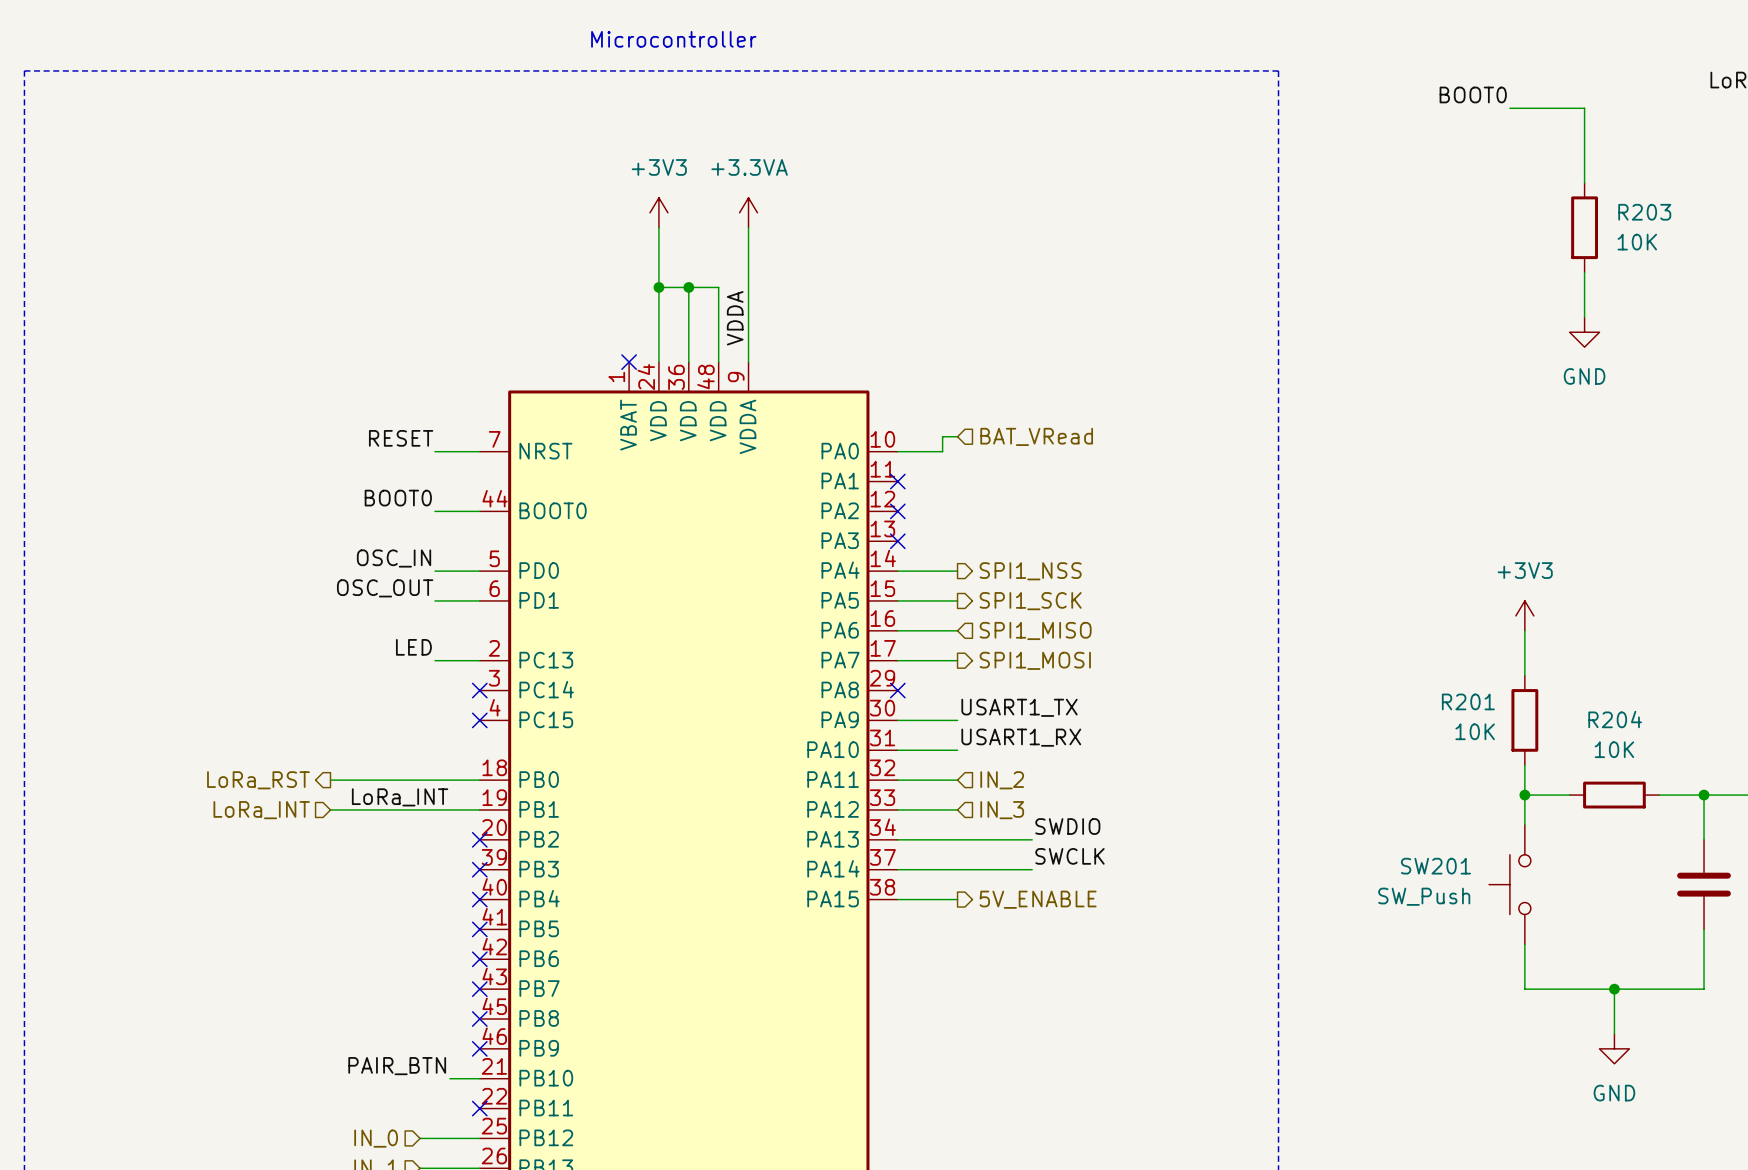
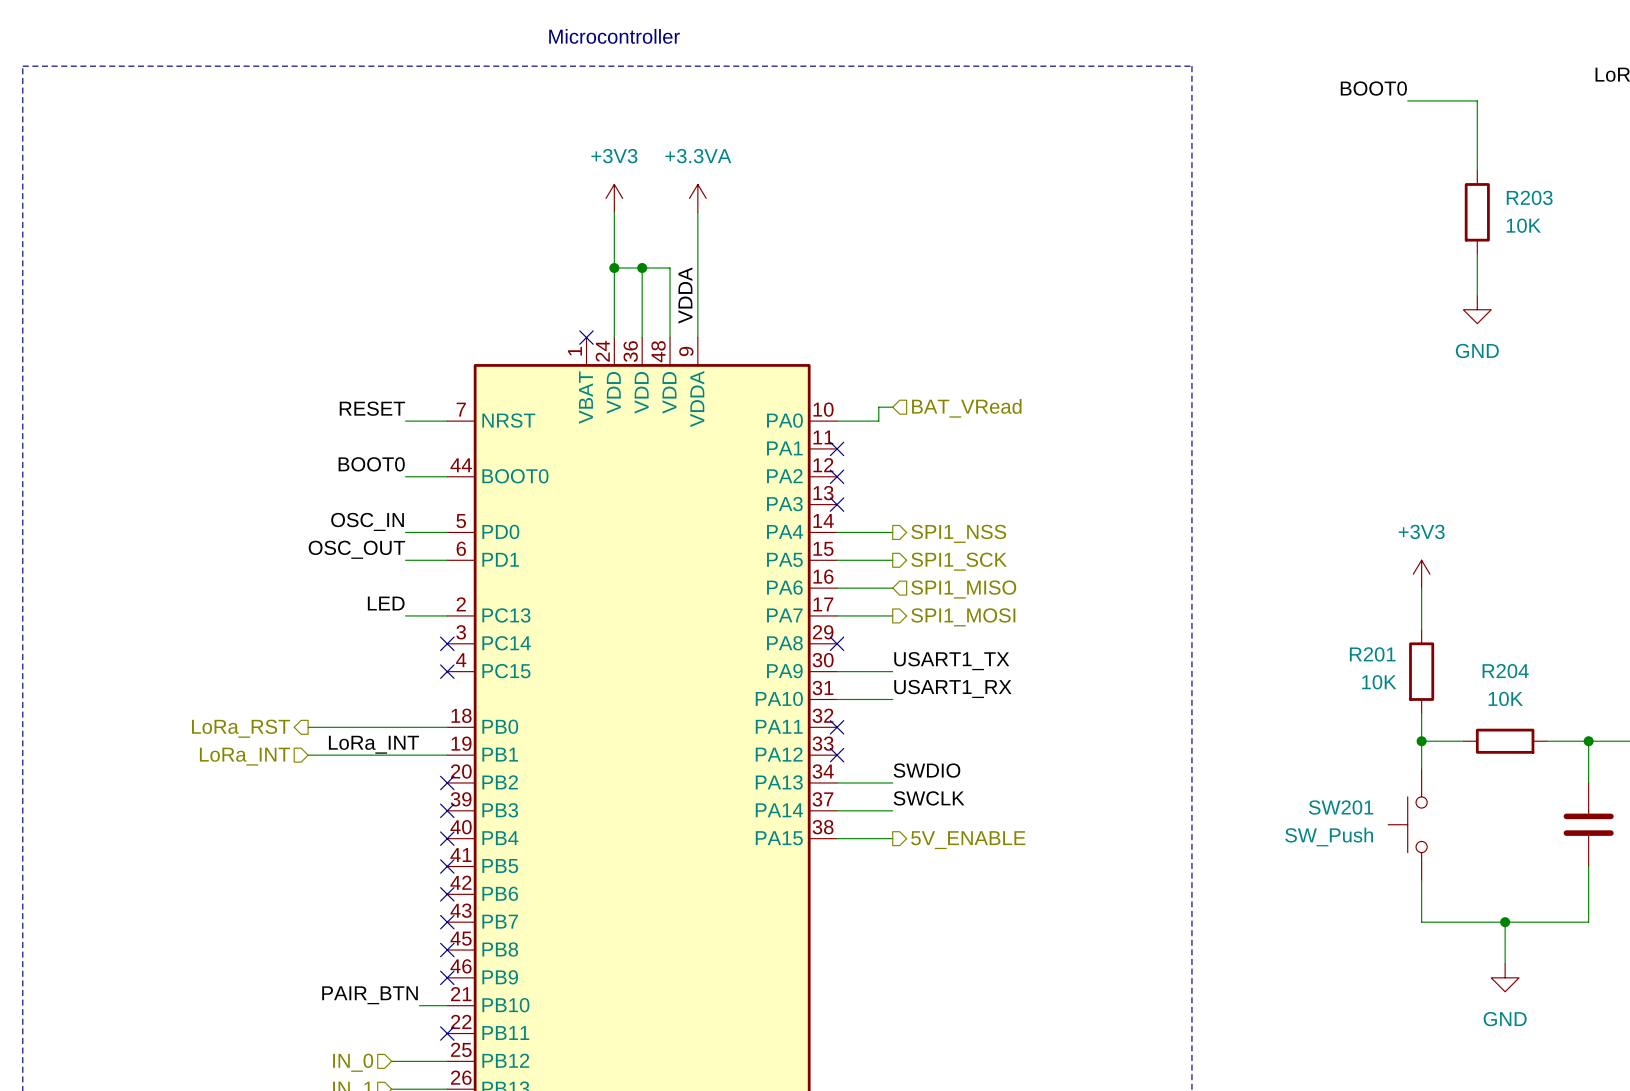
wire: (897, 780) (957, 780) -> none
no-connect mark: none -> (837, 727)
hierarchical label: IN_2 (1002, 780) -> none
wire: (897, 809) (957, 809) -> none
no-connect mark: none -> (837, 755)
hierarchical label: IN_3 (1002, 810) -> none
label position: SWDIO (1067, 826) -> SWDIO (926, 770)
wire: (957, 839) (1032, 839) -> none
label position: SWCLK (1069, 856) -> SWCLK (929, 798)
wire: (957, 869) (1032, 869) -> none

